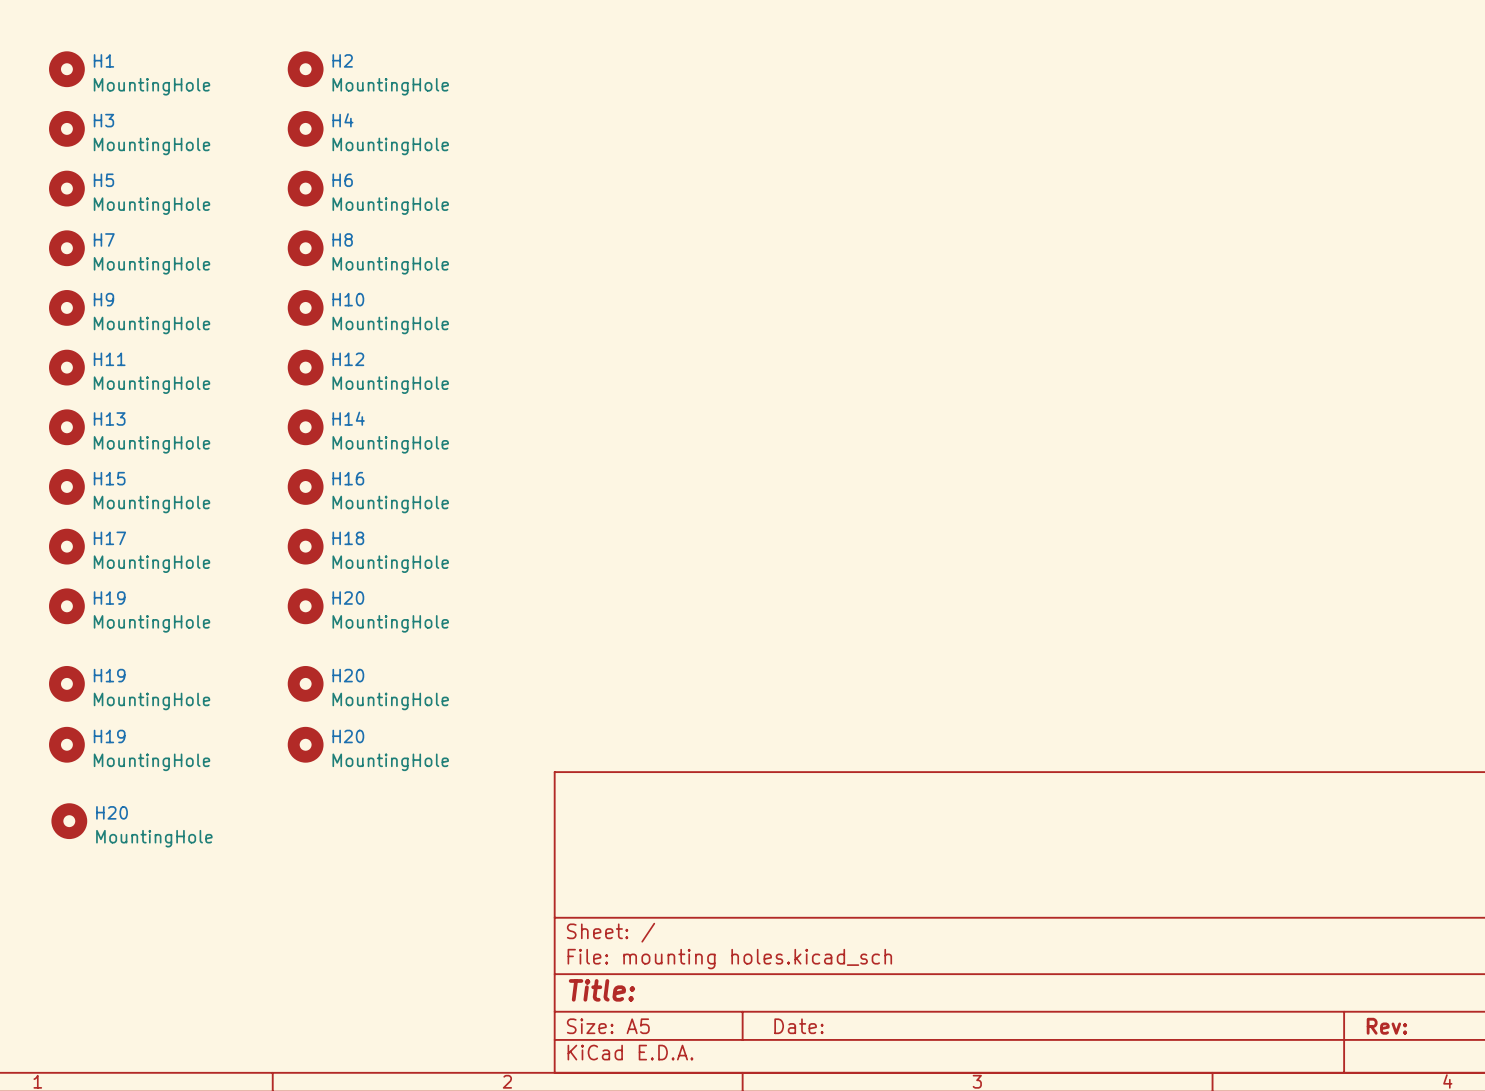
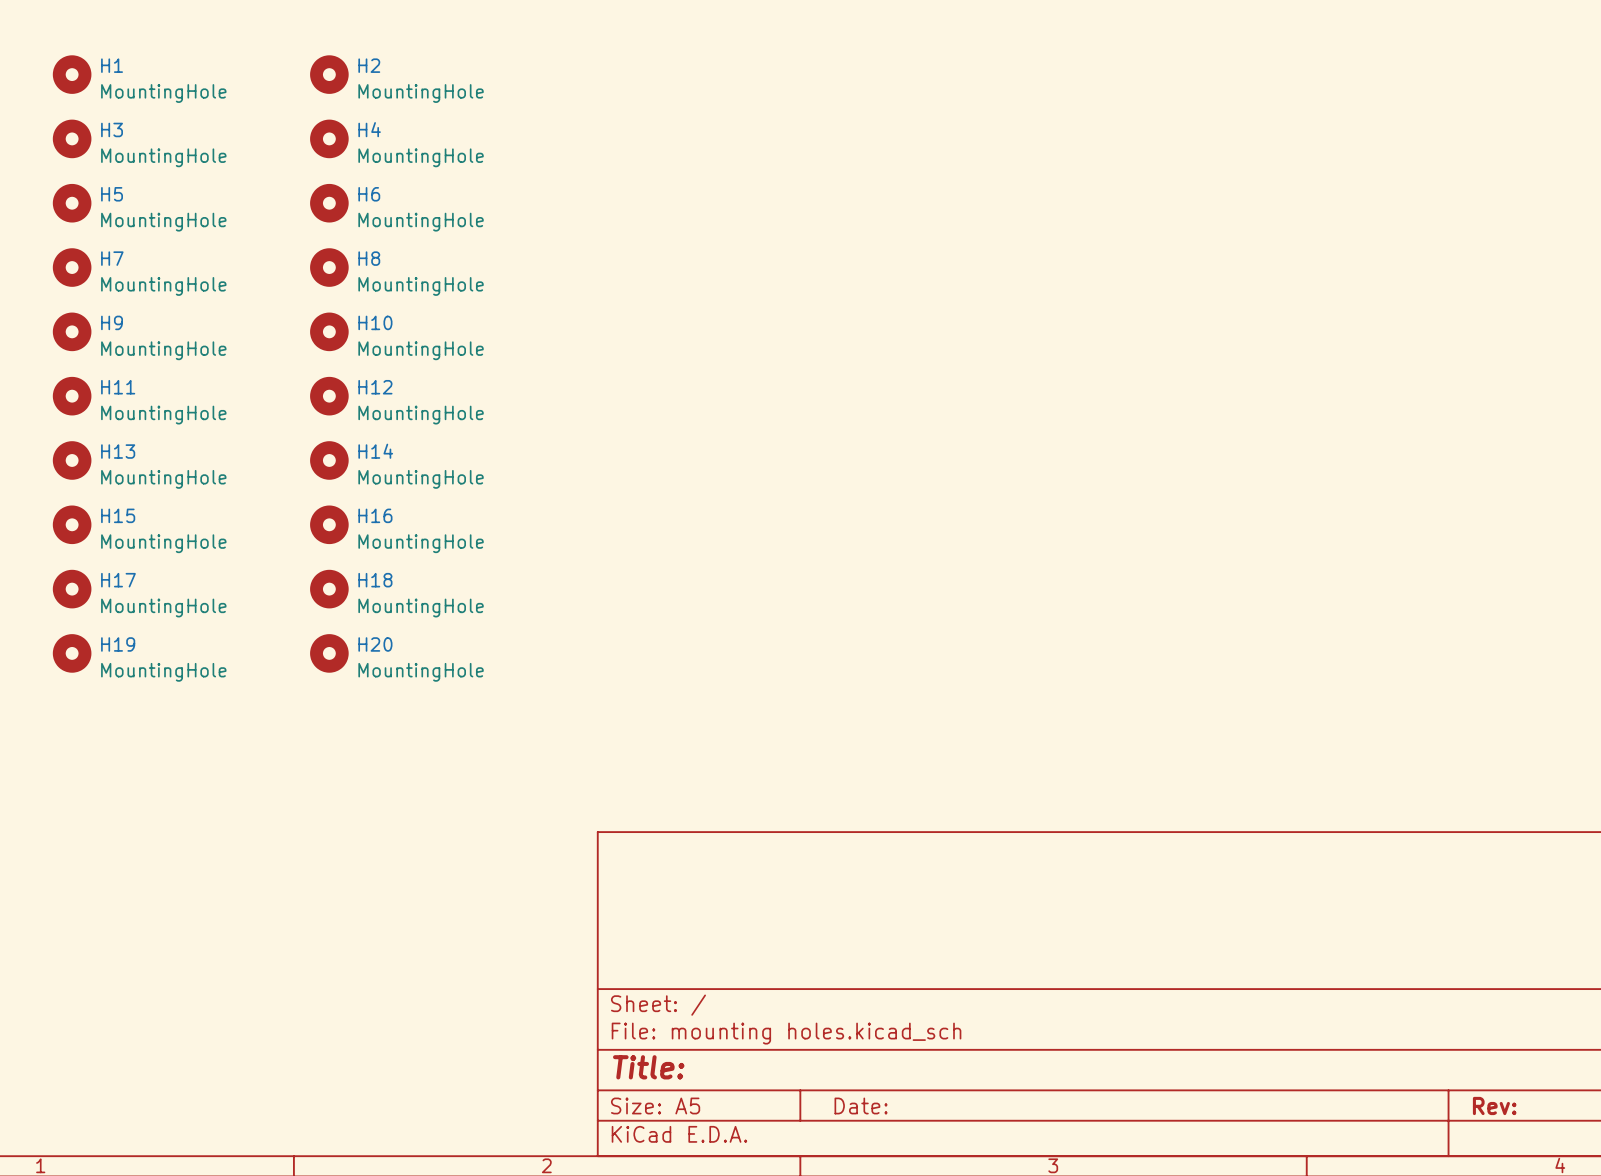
H19: MountingHole (66, 683) -> none
H20: MountingHole (305, 683) -> none
H19: MountingHole (66, 744) -> none
H20: MountingHole (305, 744) -> none
H20: MountingHole (69, 821) -> none

